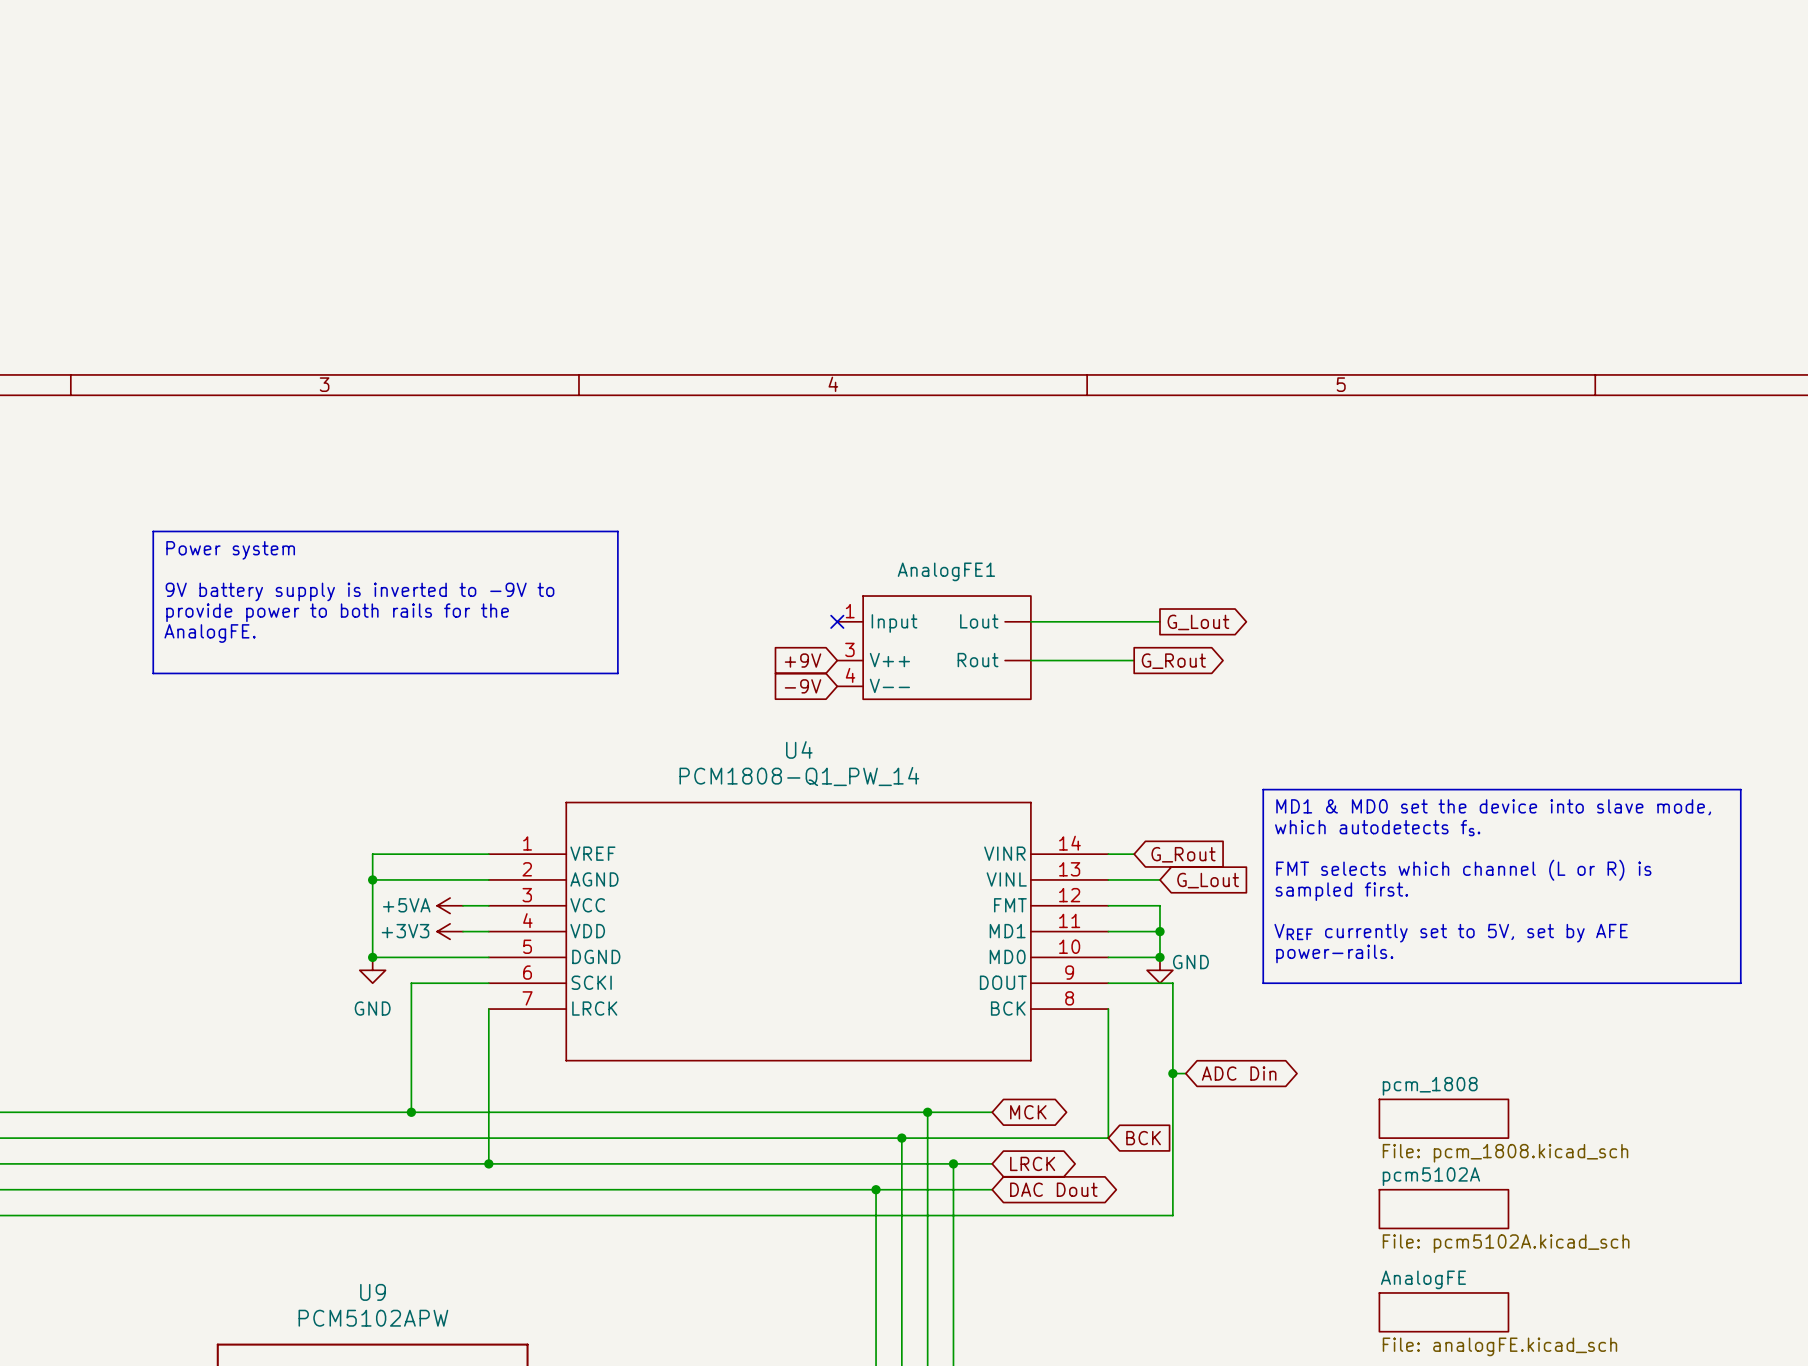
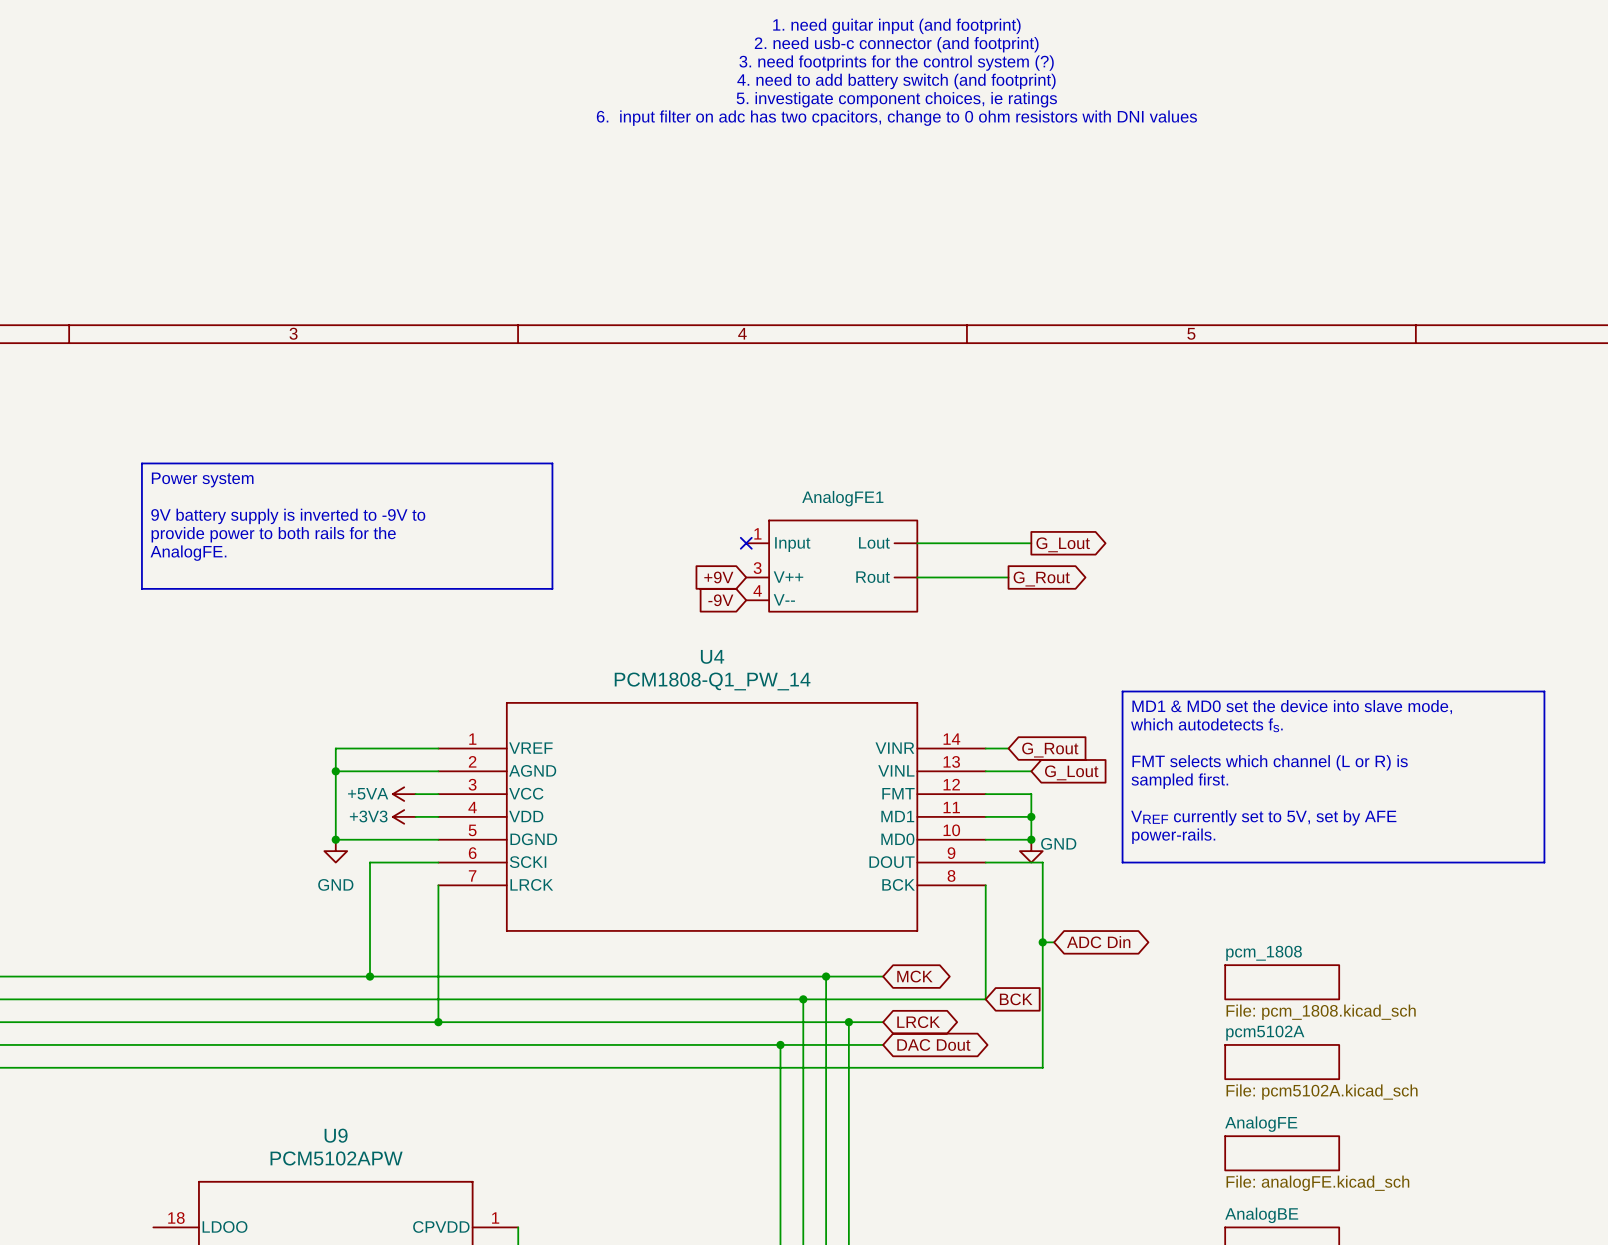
text: none -> 1. need guitar input (and footprint) (896, 26)
text: none -> 2. need usb-c connector (and footprint) (896, 44)
text: none -> 3. need footprints for the control system (?) (896, 63)
text: none -> 4. need to add battery switch (and footprint) (896, 81)
text: none -> 5. investigate component choices, ie ratings (896, 99)
text: none -> 6. input filter on adc has two cpacitors, change to 0 ohm resistors with DNI values (896, 118)

